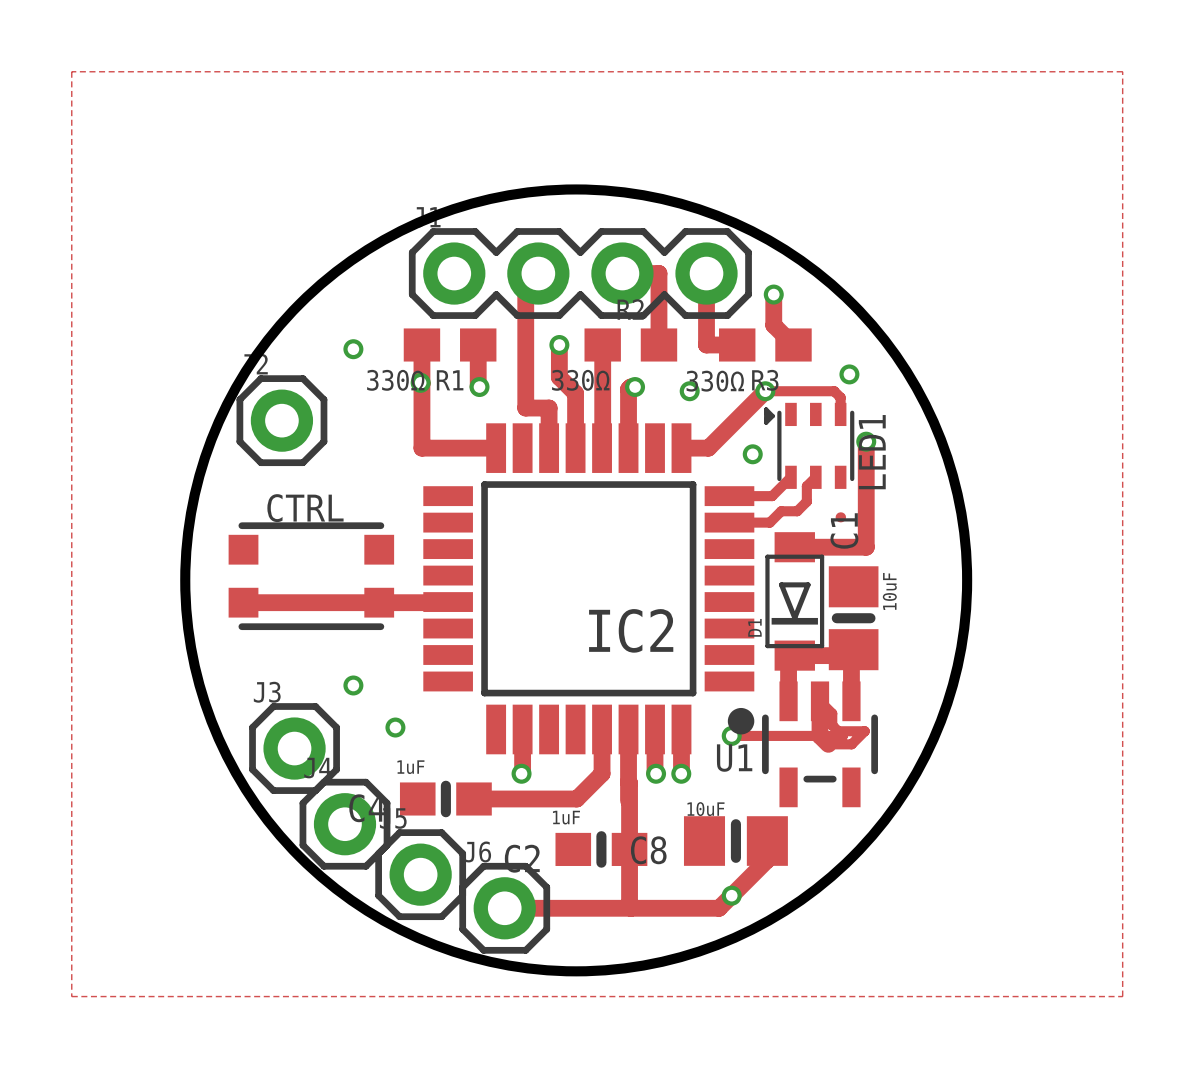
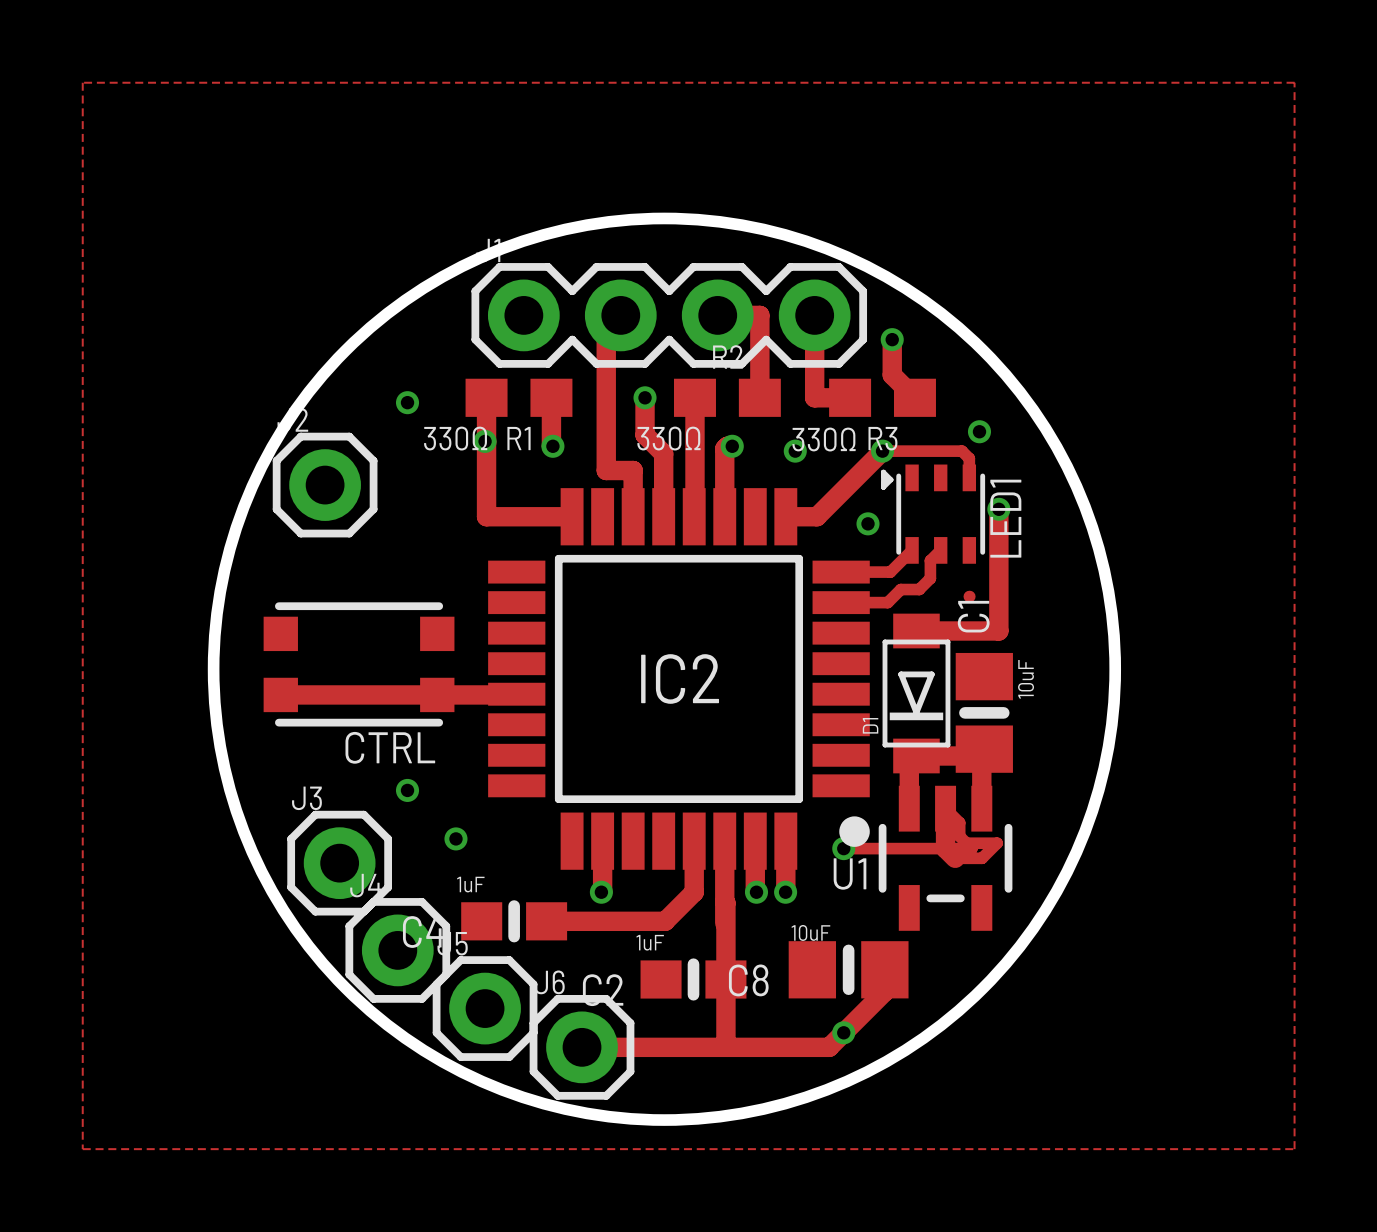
CTRL name position: CTRL (305, 508) -> CTRL (390, 747)
IC2 name position: IC2 (631, 630) -> IC2 (680, 678)

